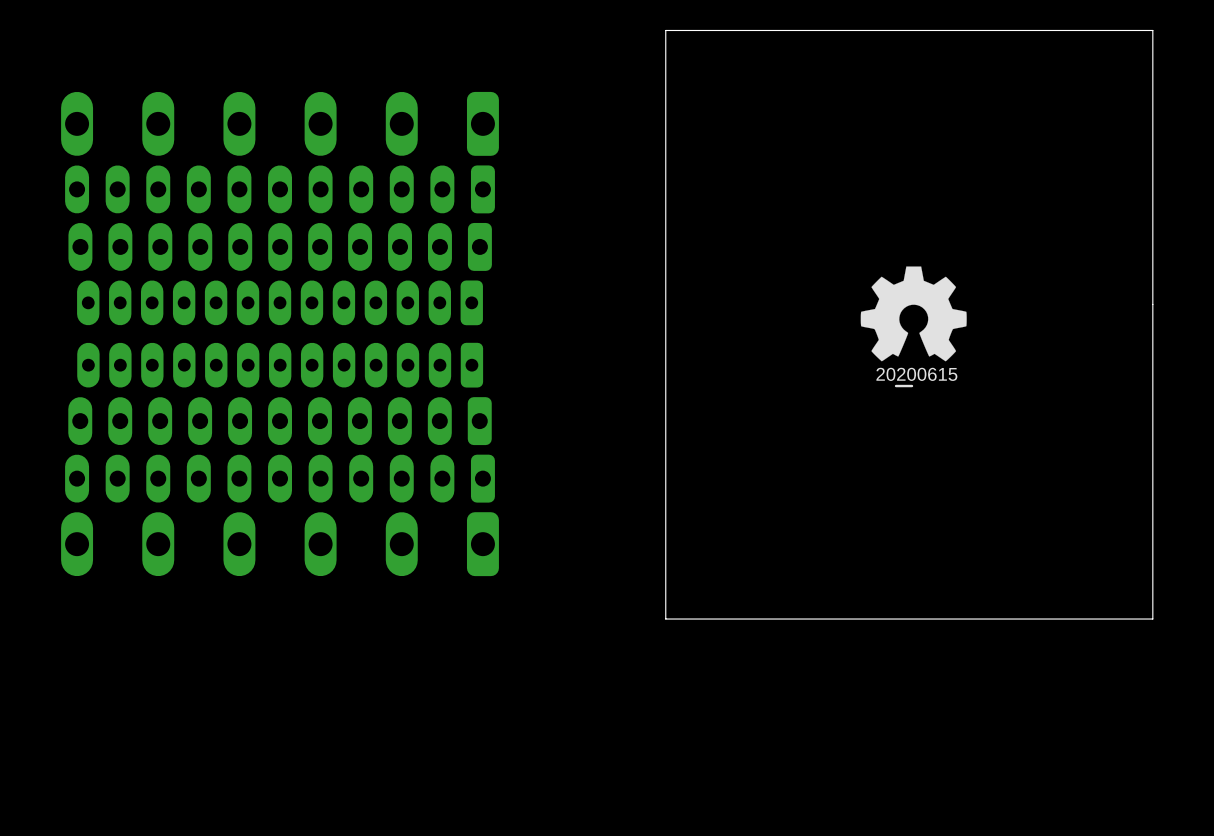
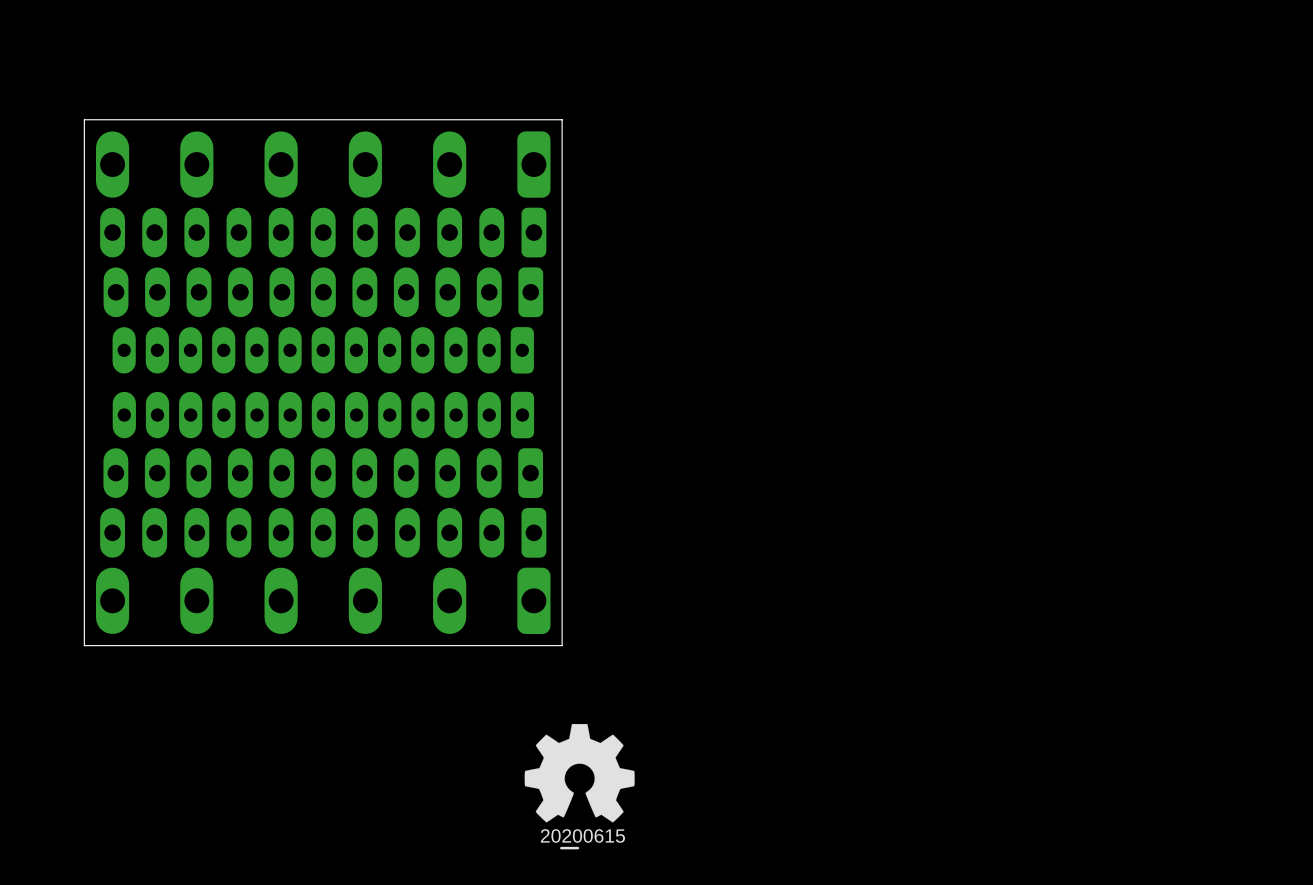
board edge: (1152, 30) (1152, 619) (665, 619) (665, 30) (1152, 30) -> none
board edge: none -> (562, 119) (562, 645) (84, 645) (84, 119) (562, 119)
drawing: [860, 266, 967, 388] -> none
drawing: none -> [524, 724, 635, 850]

